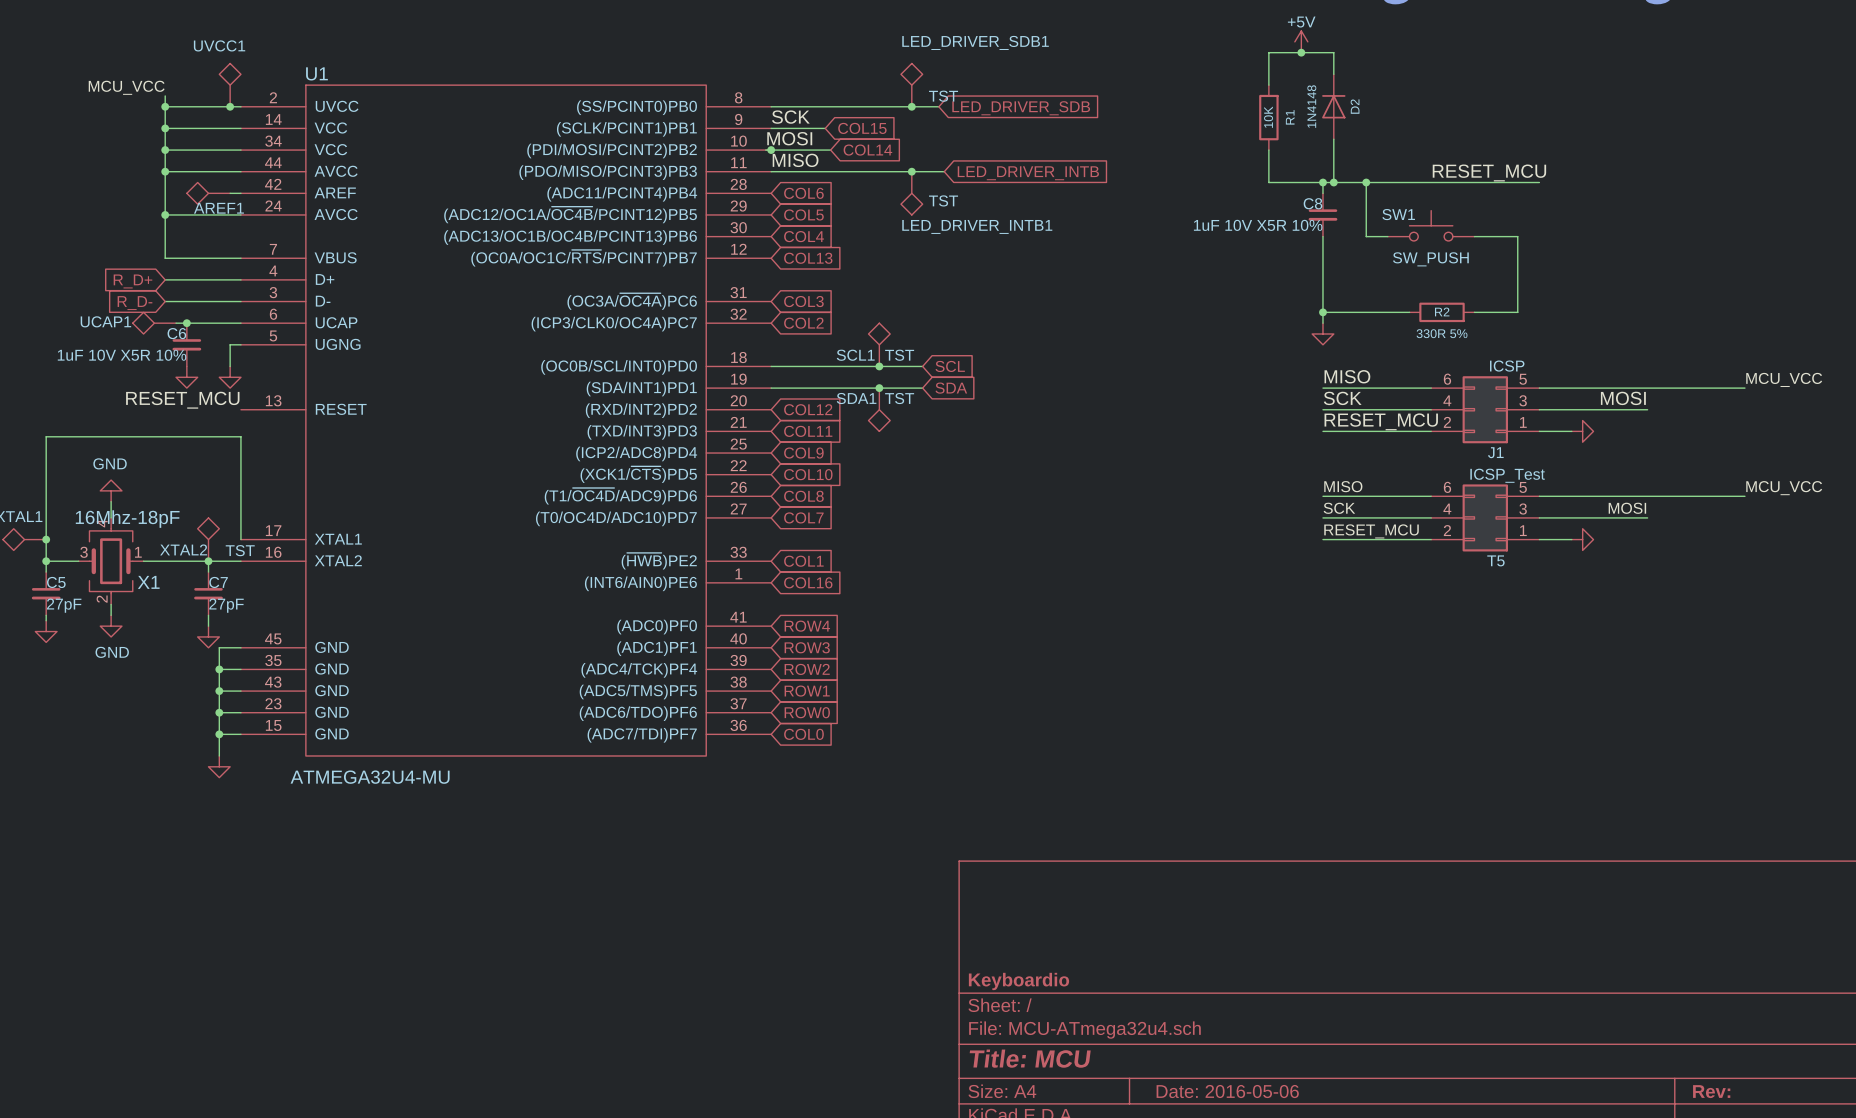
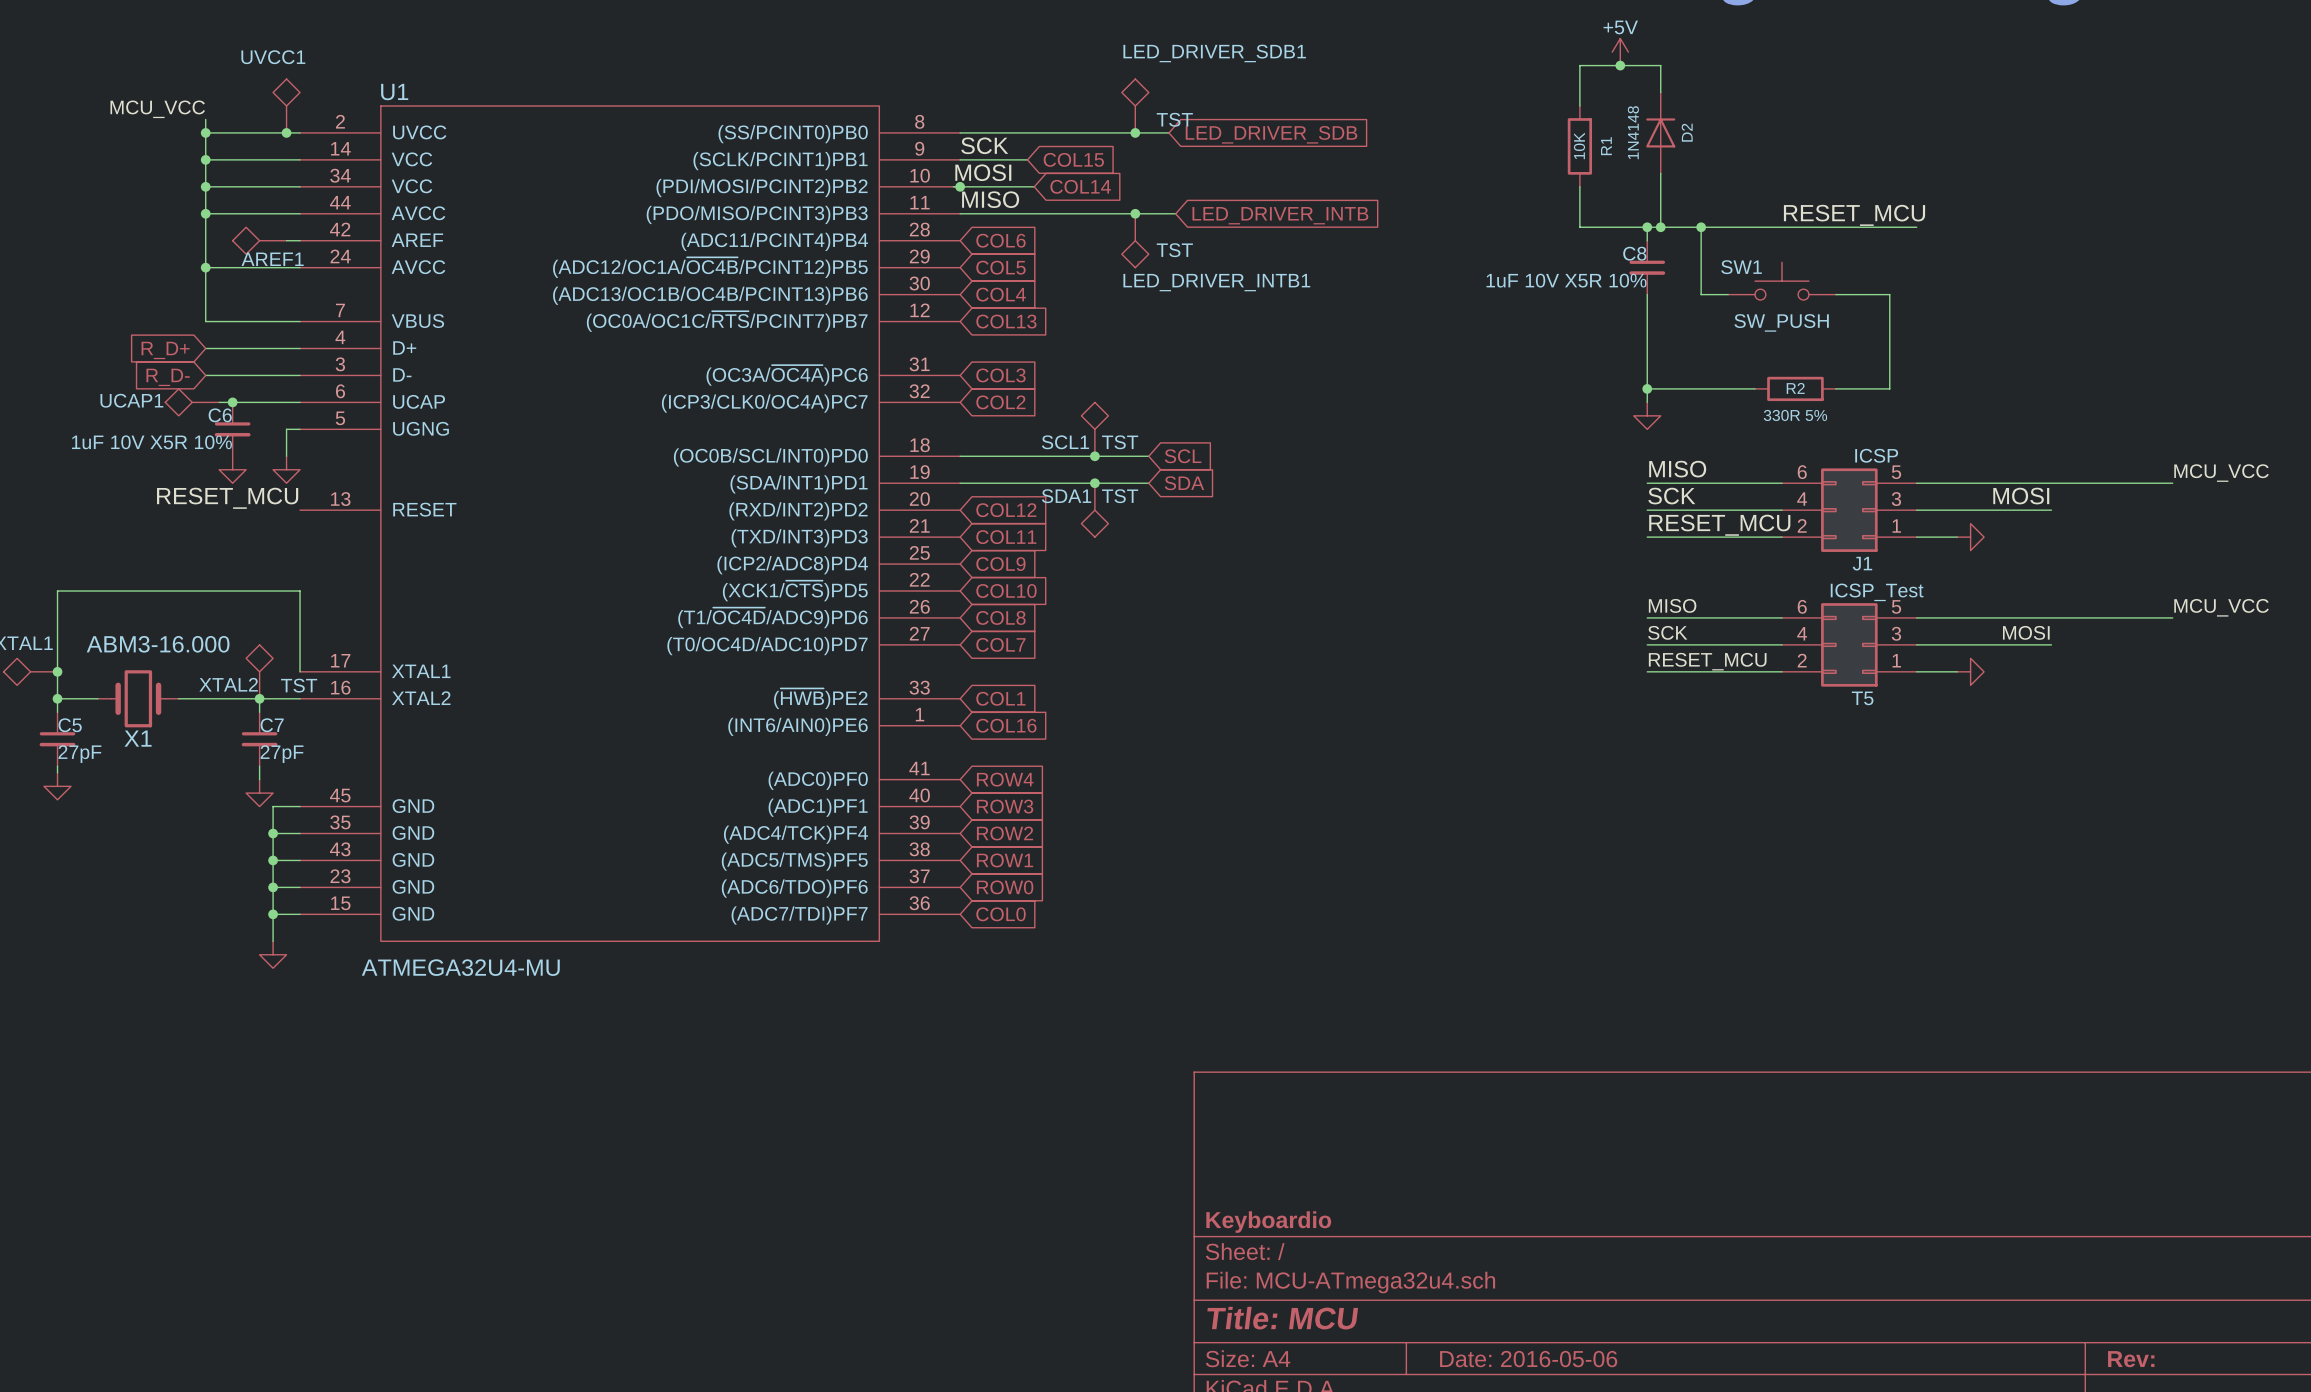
wire: (46, 474) (46, 436) (240, 436) (240, 474) -> (57, 591) (300, 591)
power symbol: GND (111, 490) -> none
wire: (111, 501) (111, 517) -> none
X1 symbol: [78, 517, 144, 605] -> [97, 670, 179, 728]
X1 value: 16Mhz-18pF (127, 519) -> ABM3-16.000 (158, 644)
X1 name position: X1 (148, 582) -> X1 (138, 738)
wire: (111, 604) (111, 615) -> none
power symbol: GND (111, 626) -> none

